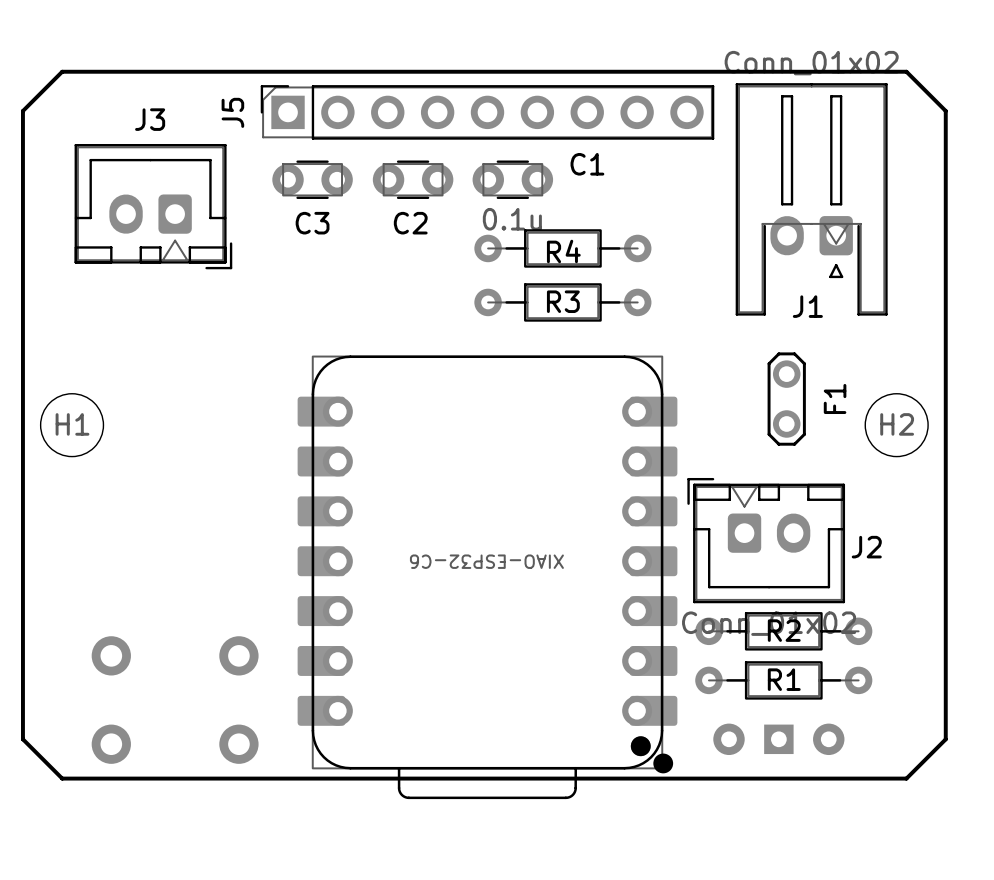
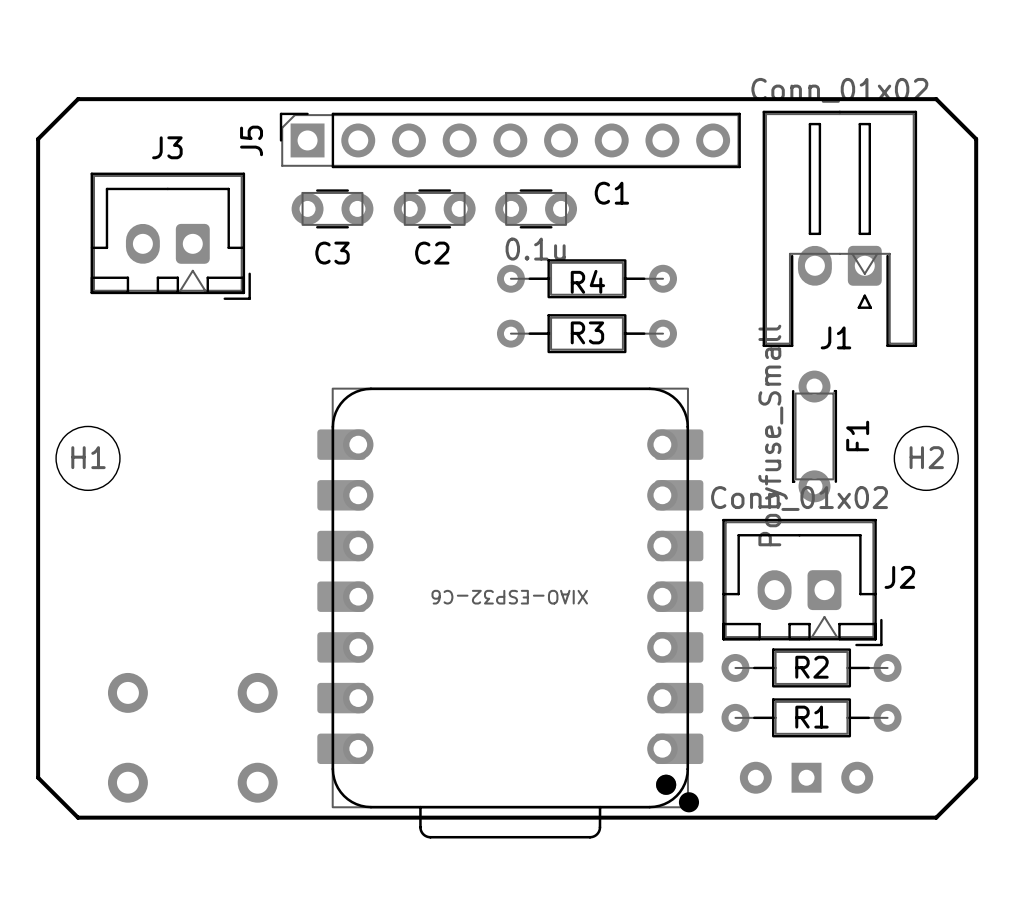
F1 footprint: [767, 352, 806, 446] -> [791, 370, 838, 503]
F1 value: none -> Polyfuse_Small (773, 435)
J2 rotation: 0° (766, 540) -> 180° (802, 582)

